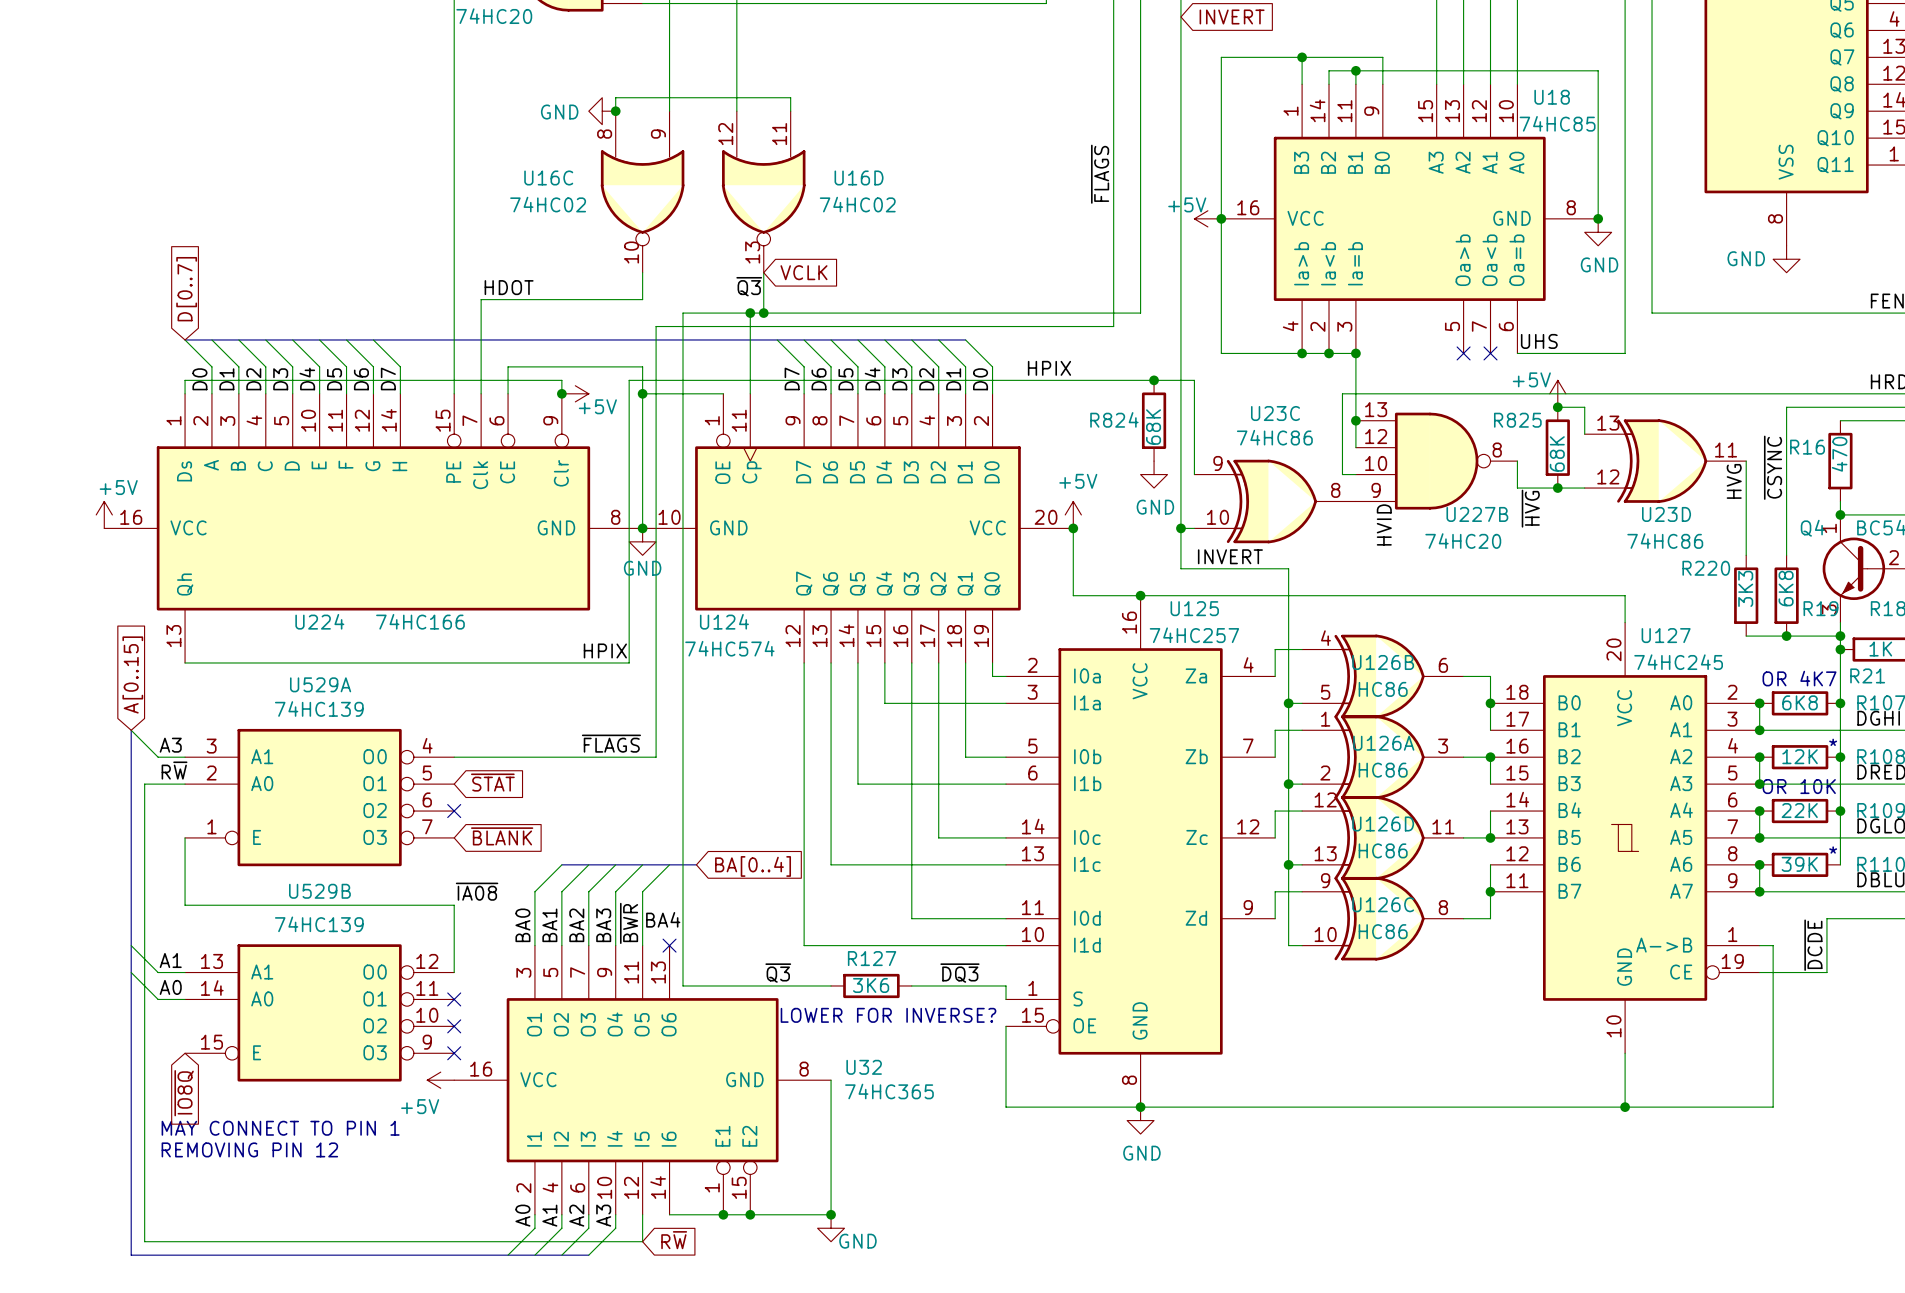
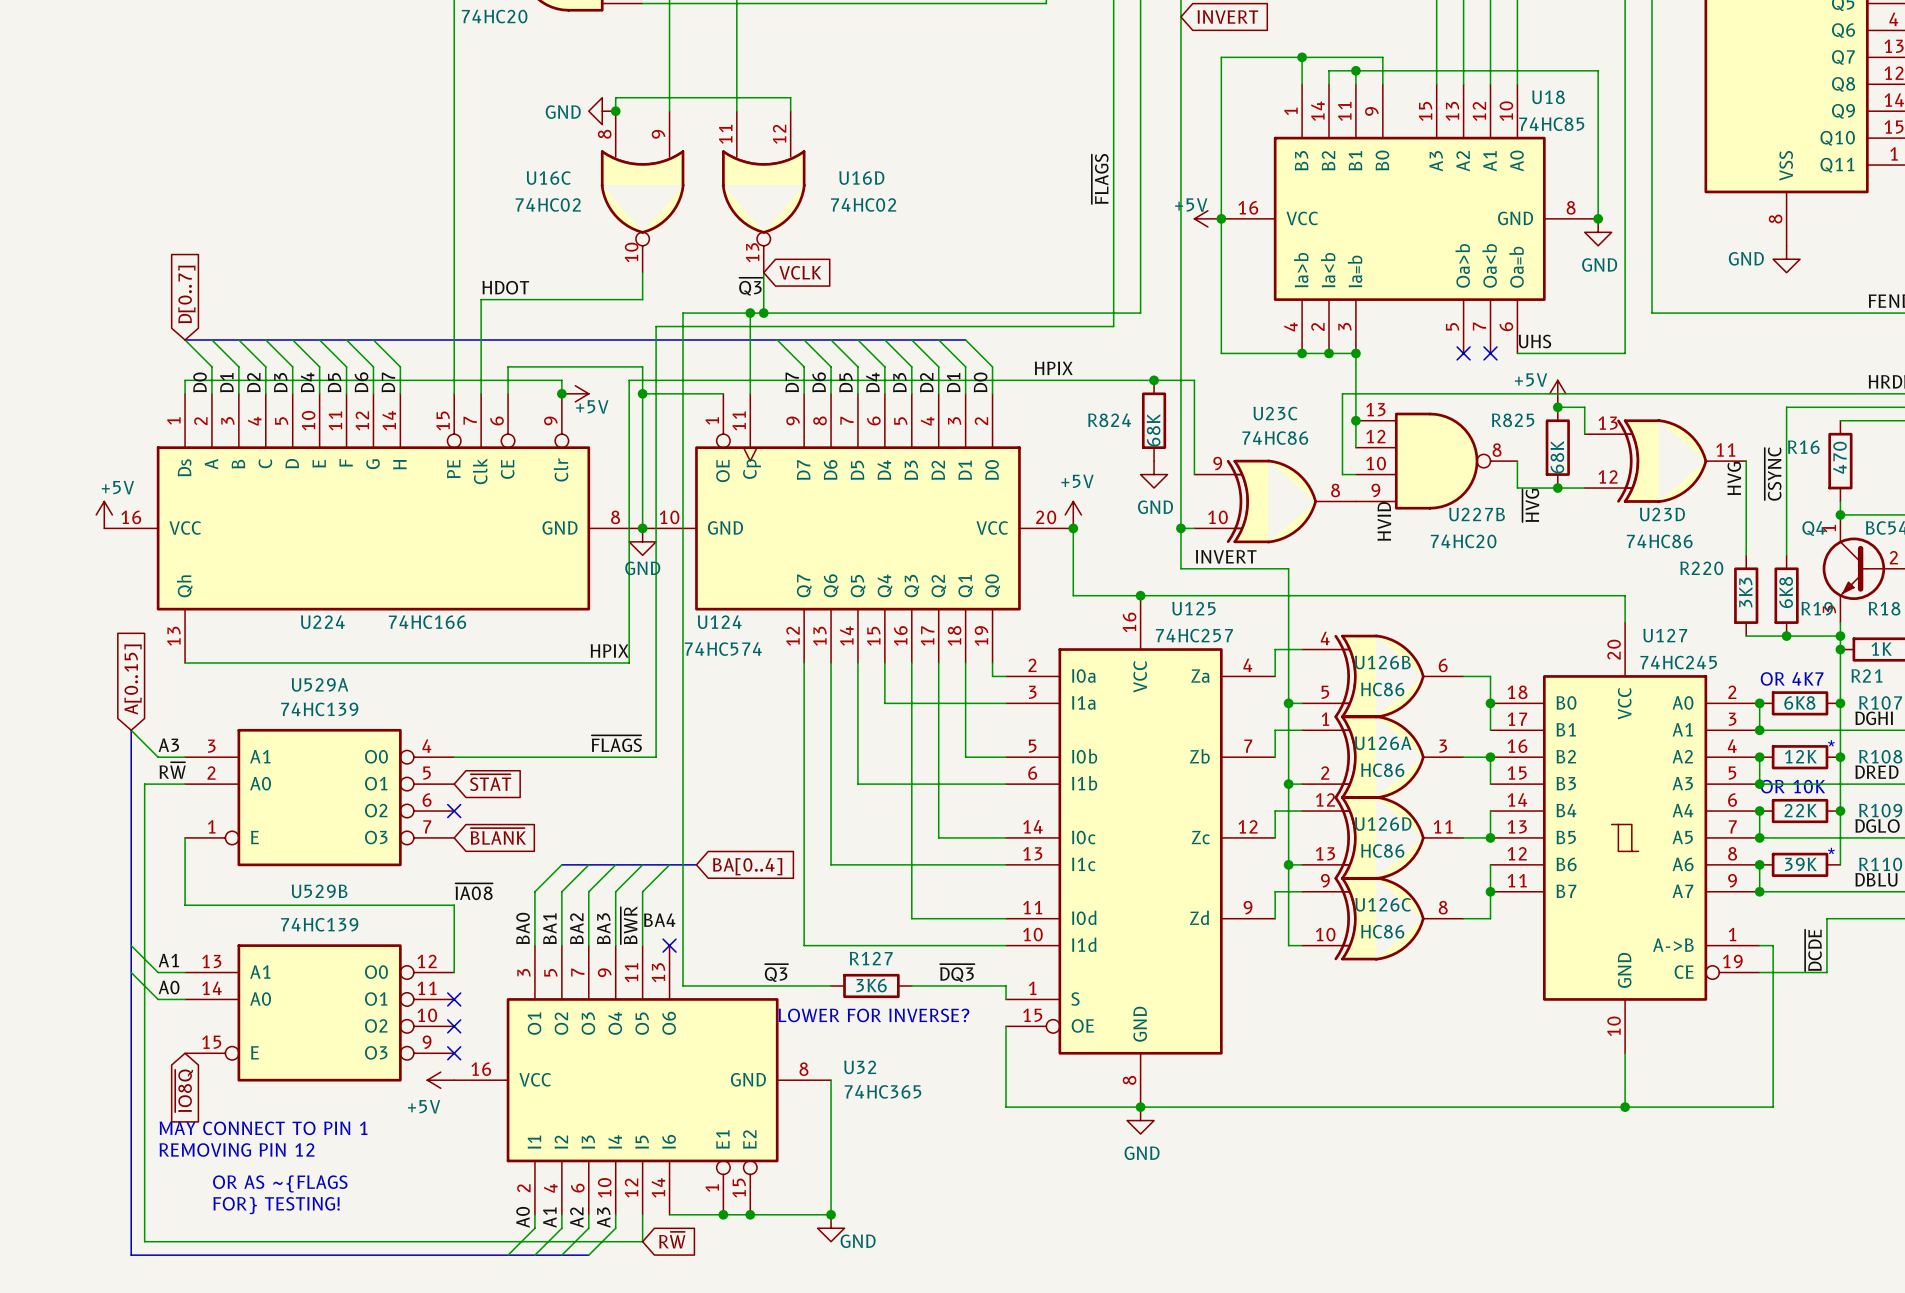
U16D flip: as is (763, 191) -> left-right (763, 191)
text: none -> OR AS ~{FLAGS (280, 1183)
text: none -> FOR} TESTING! (276, 1205)

